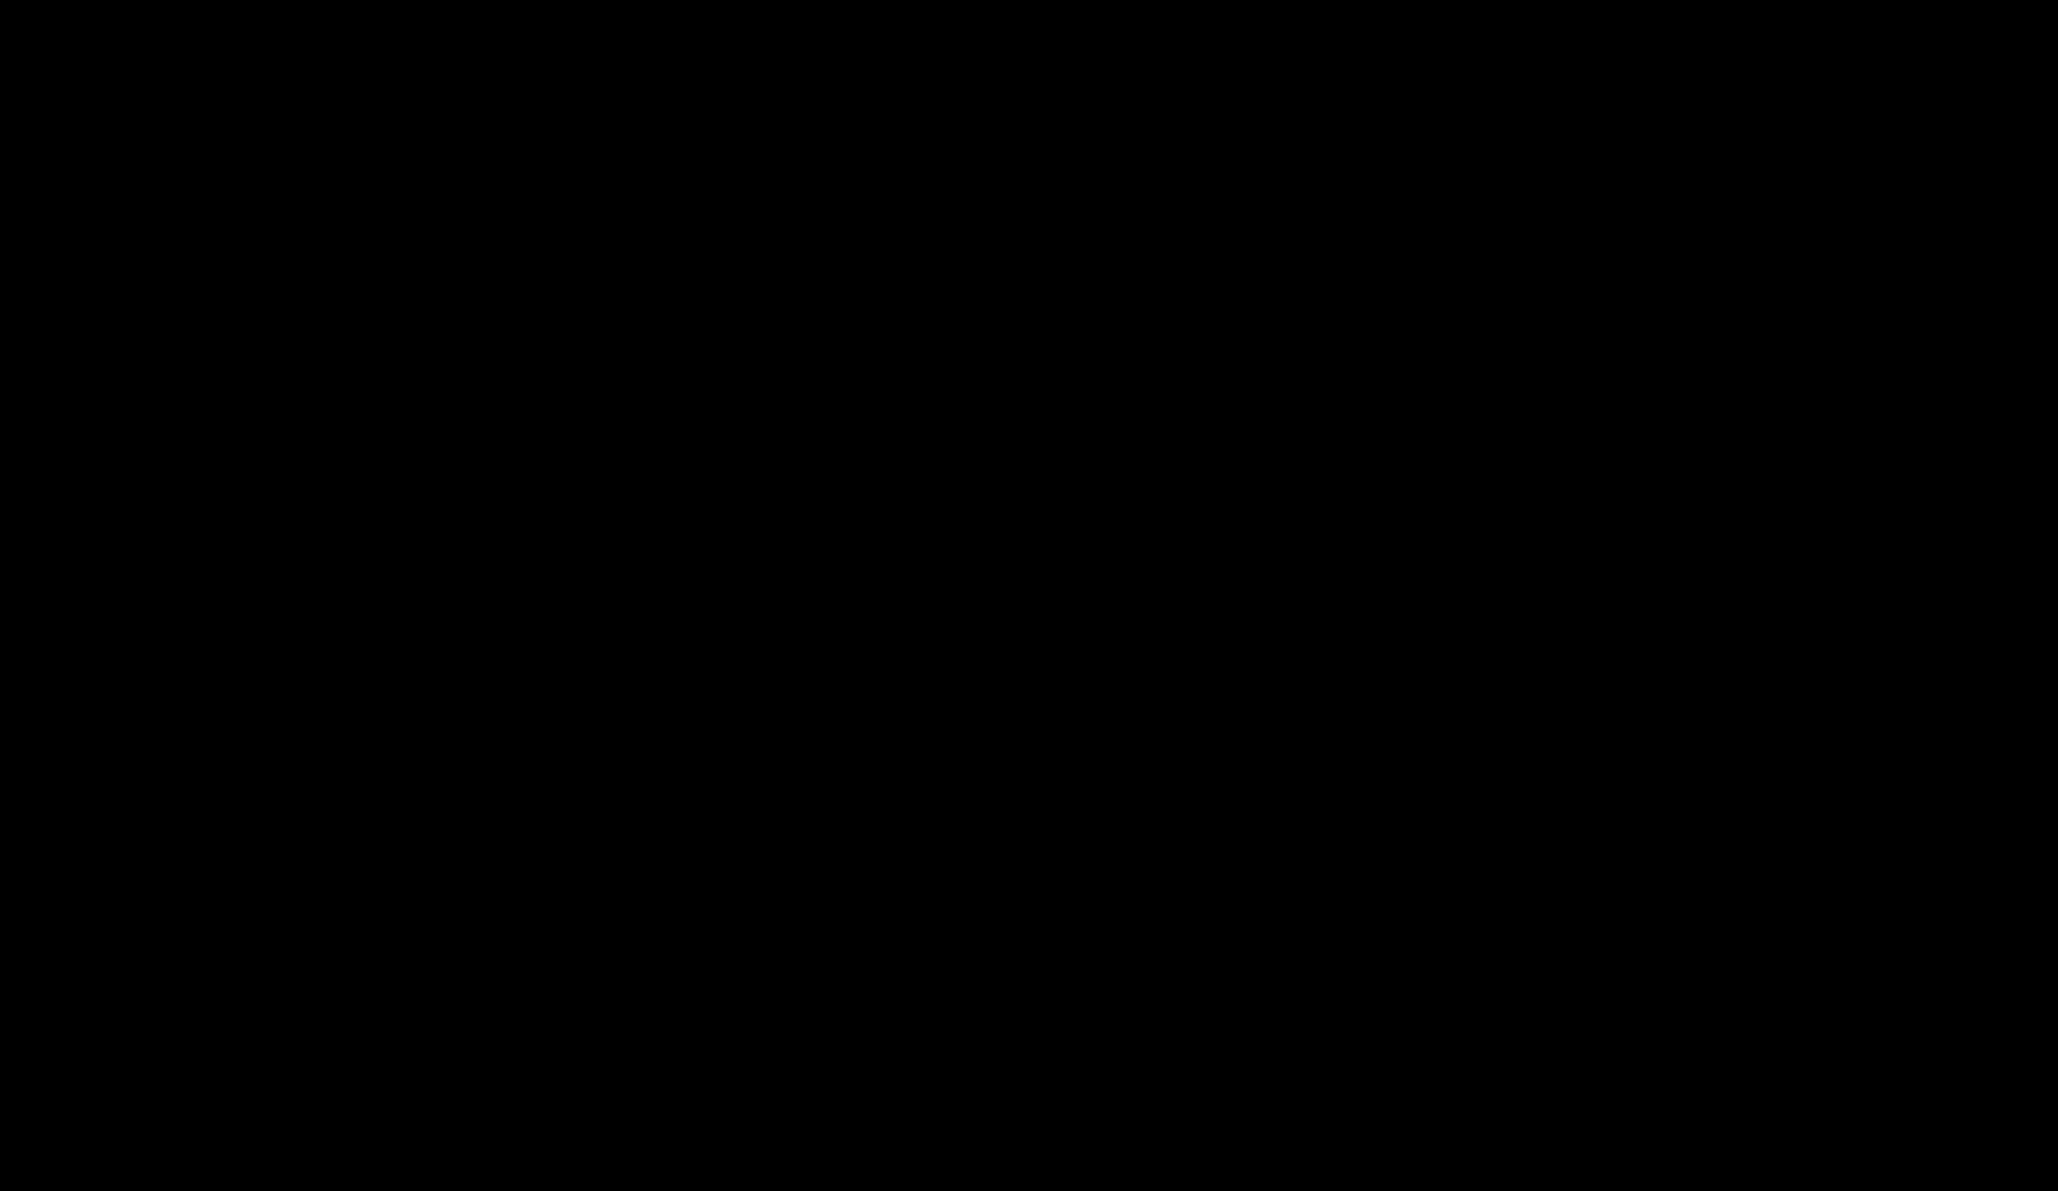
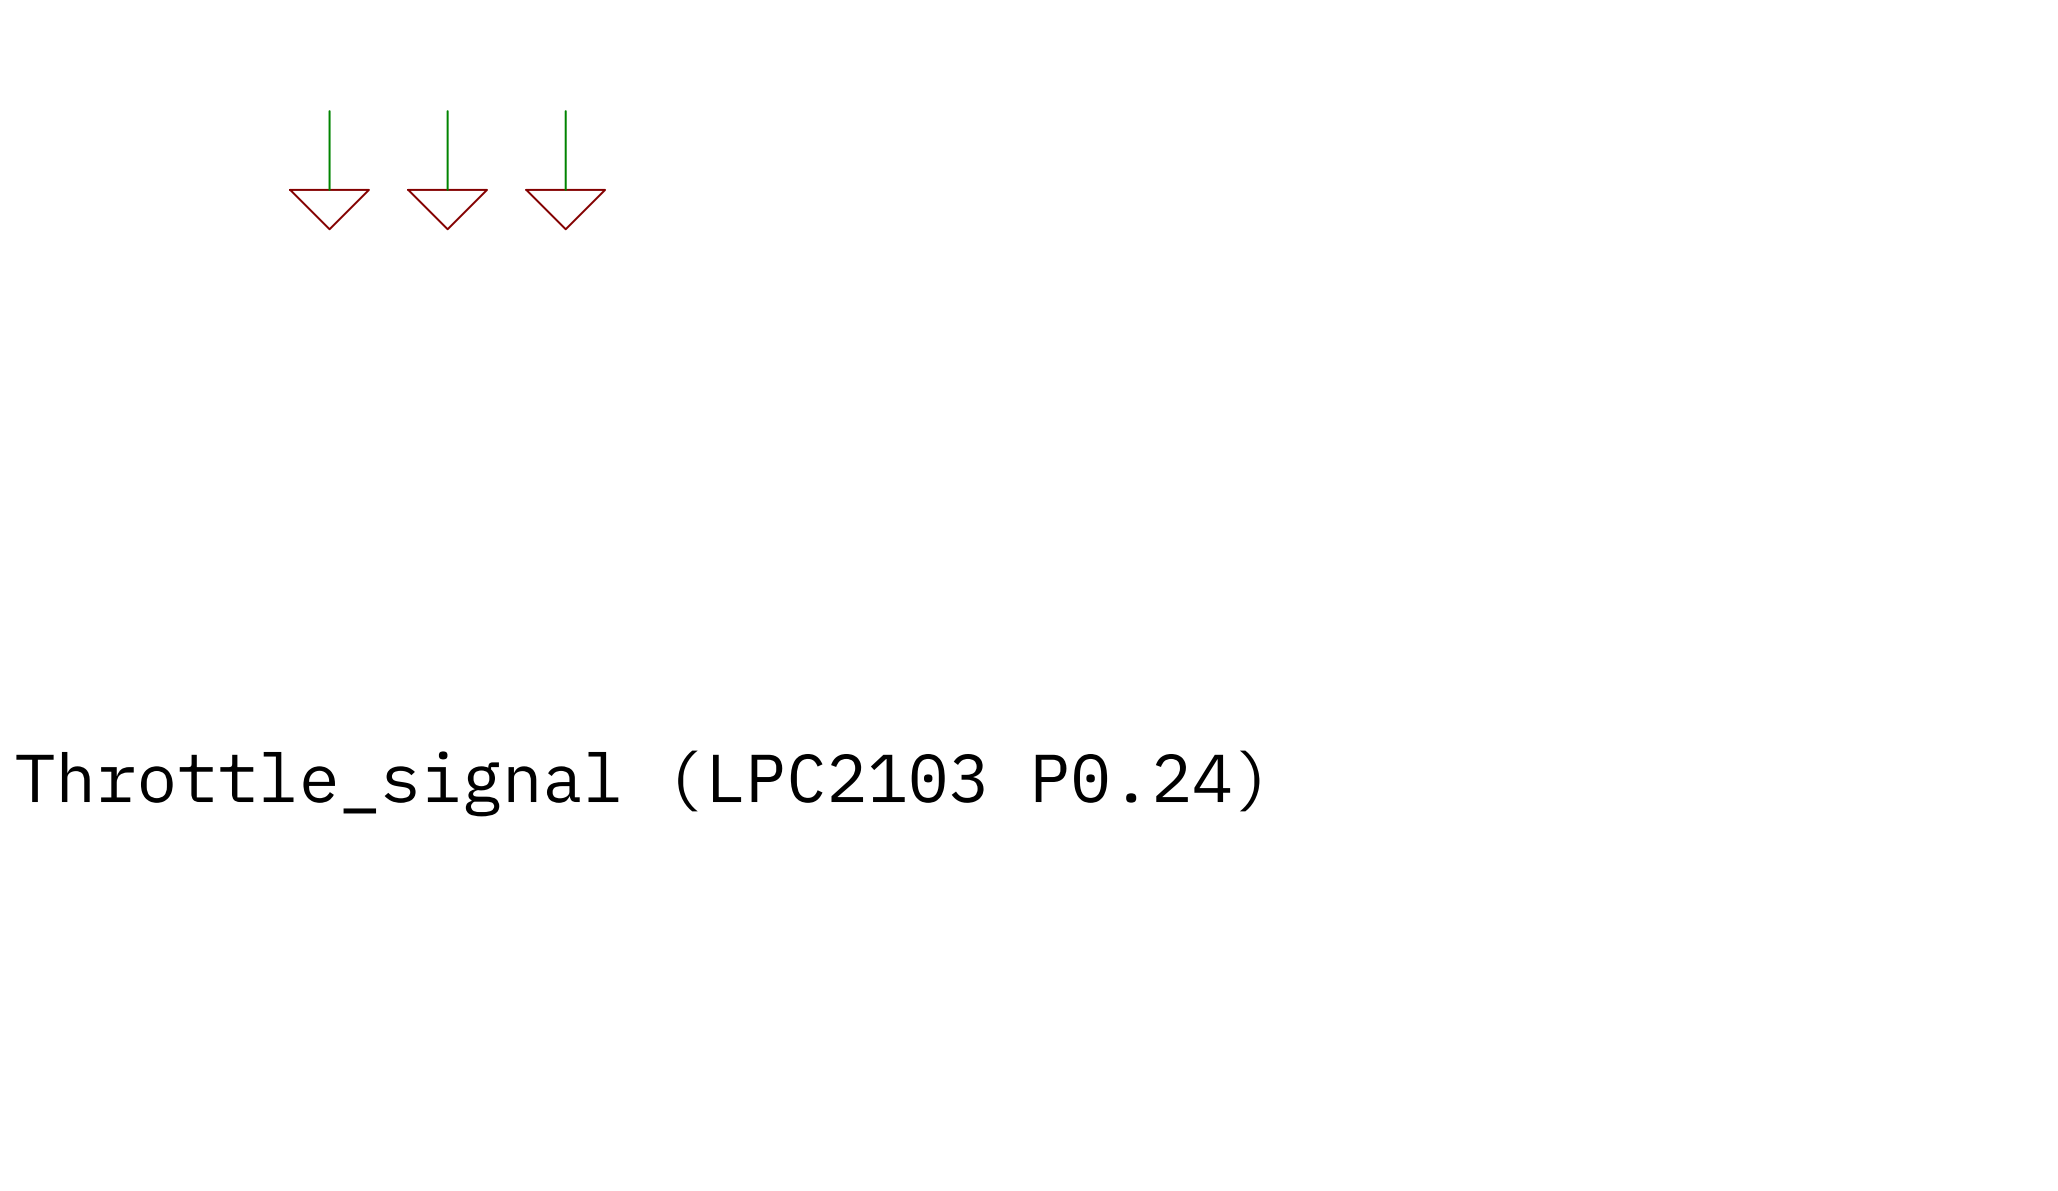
wire: none -> (329, 111) (329, 189)
wire: none -> (447, 111) (447, 189)
wire: none -> (565, 111) (565, 189)
power symbol: none -> (329, 209)
power symbol: none -> (447, 209)
power symbol: none -> (565, 209)
label: none -> Throttle_signal (LPC2103 P0.24) (637, 783)

